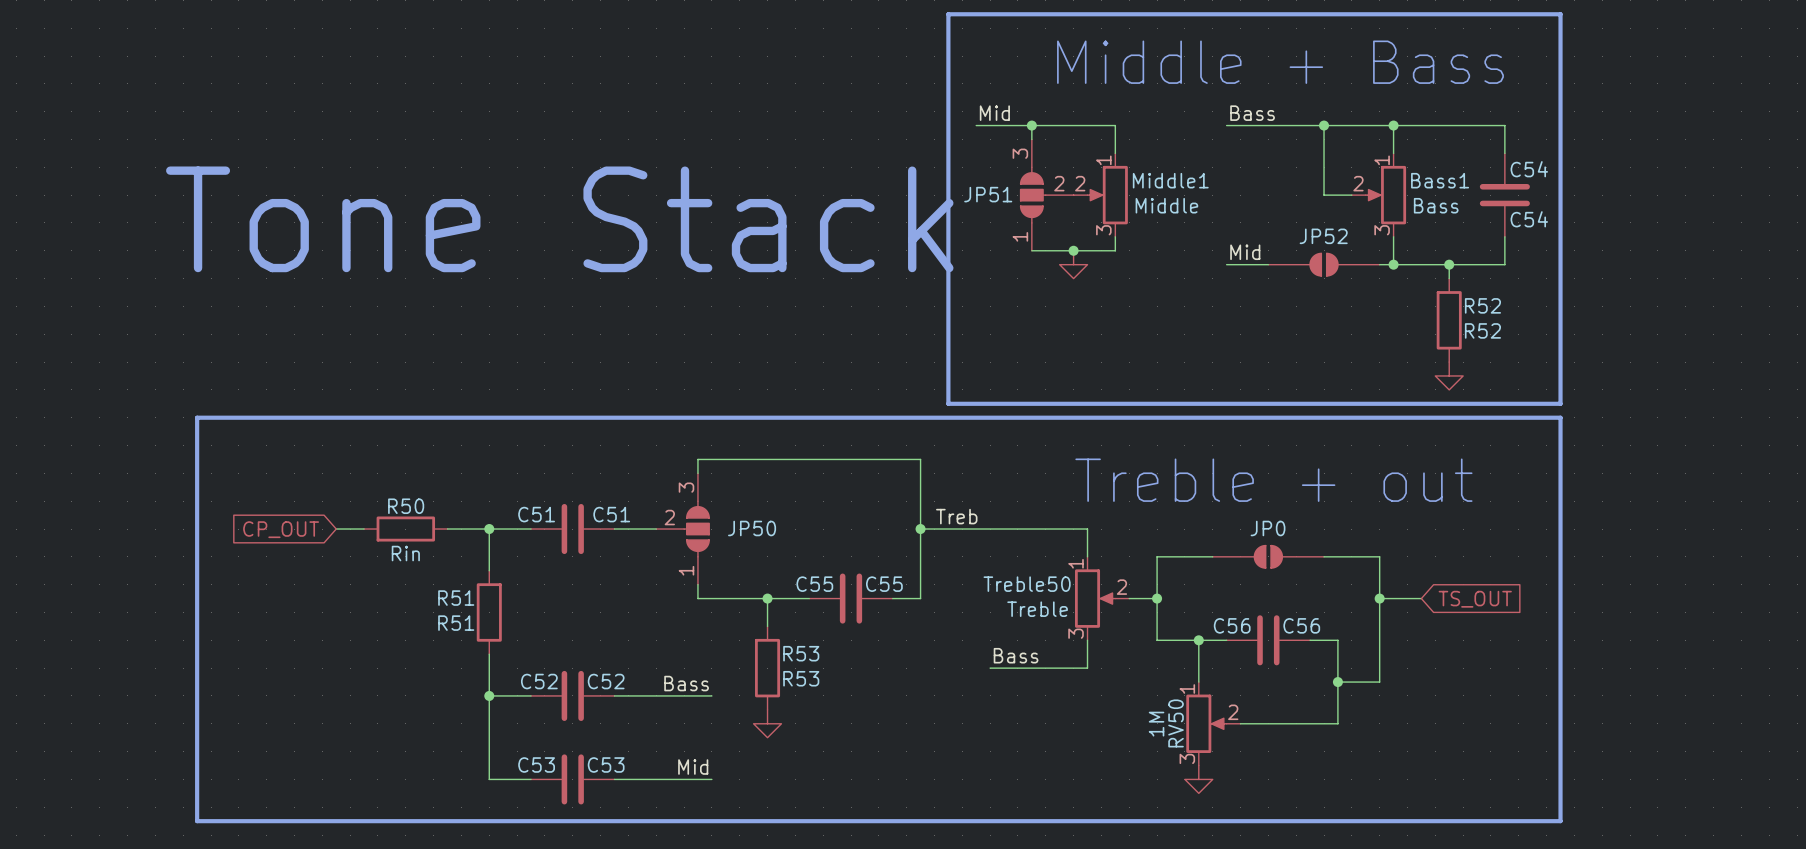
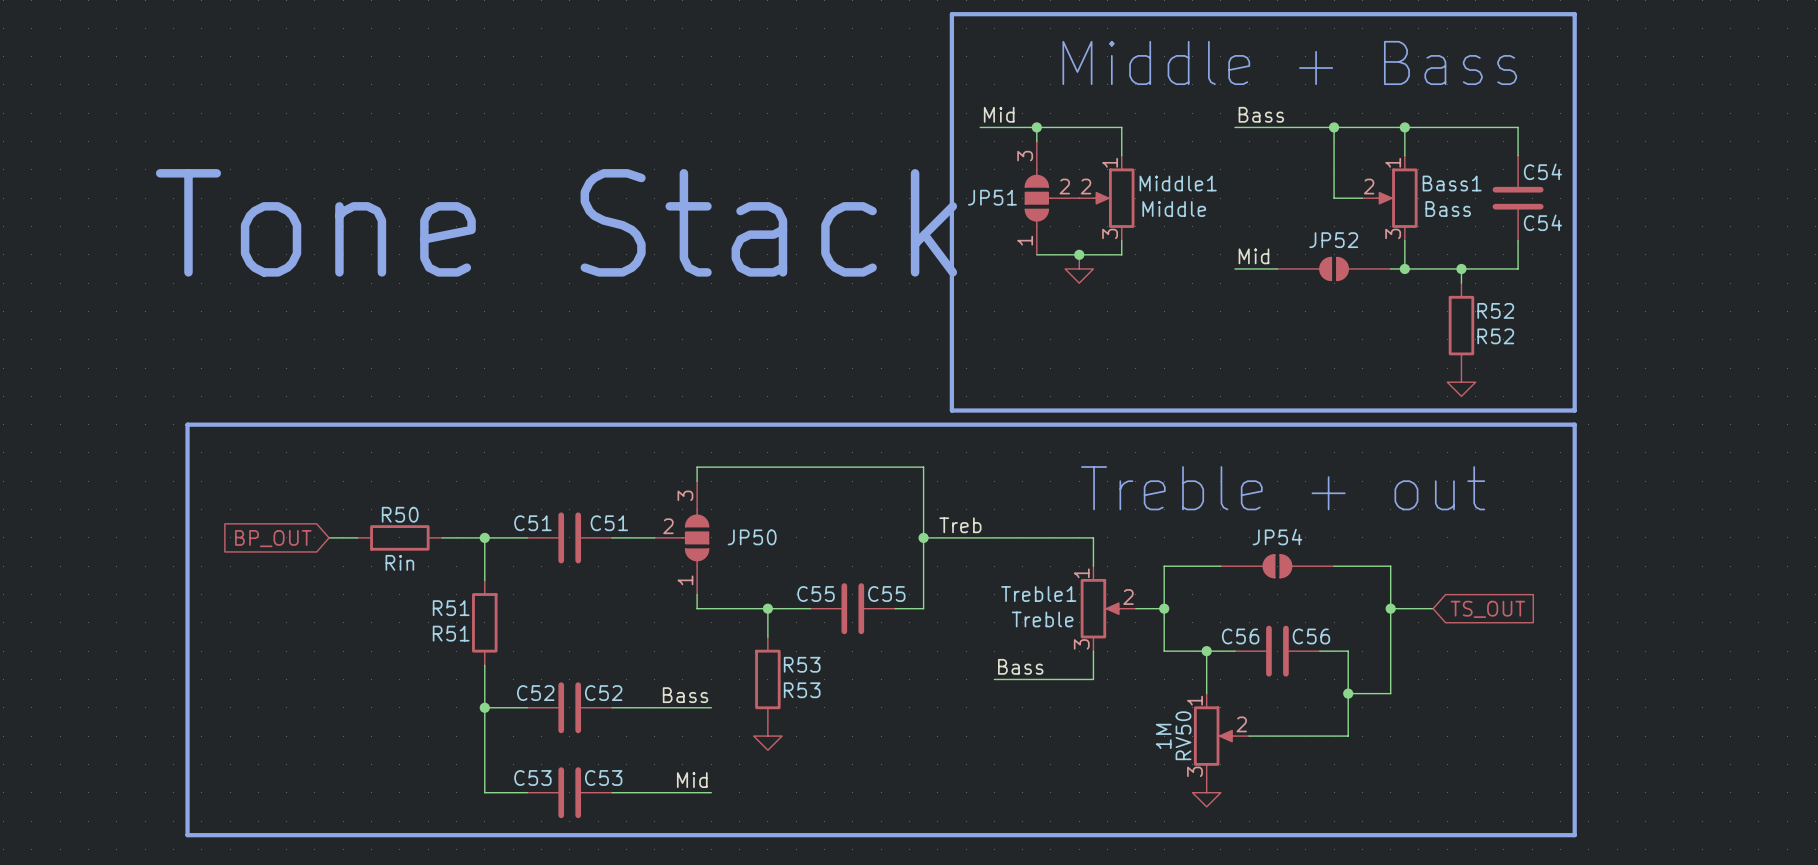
JP0 name: JP0 (1268, 528) -> JP54 (1277, 537)
global label: CP_OUT (281, 529) -> BP_OUT (273, 538)
Treble50 name: Treble50 (1027, 584) -> Treble1 (1038, 594)

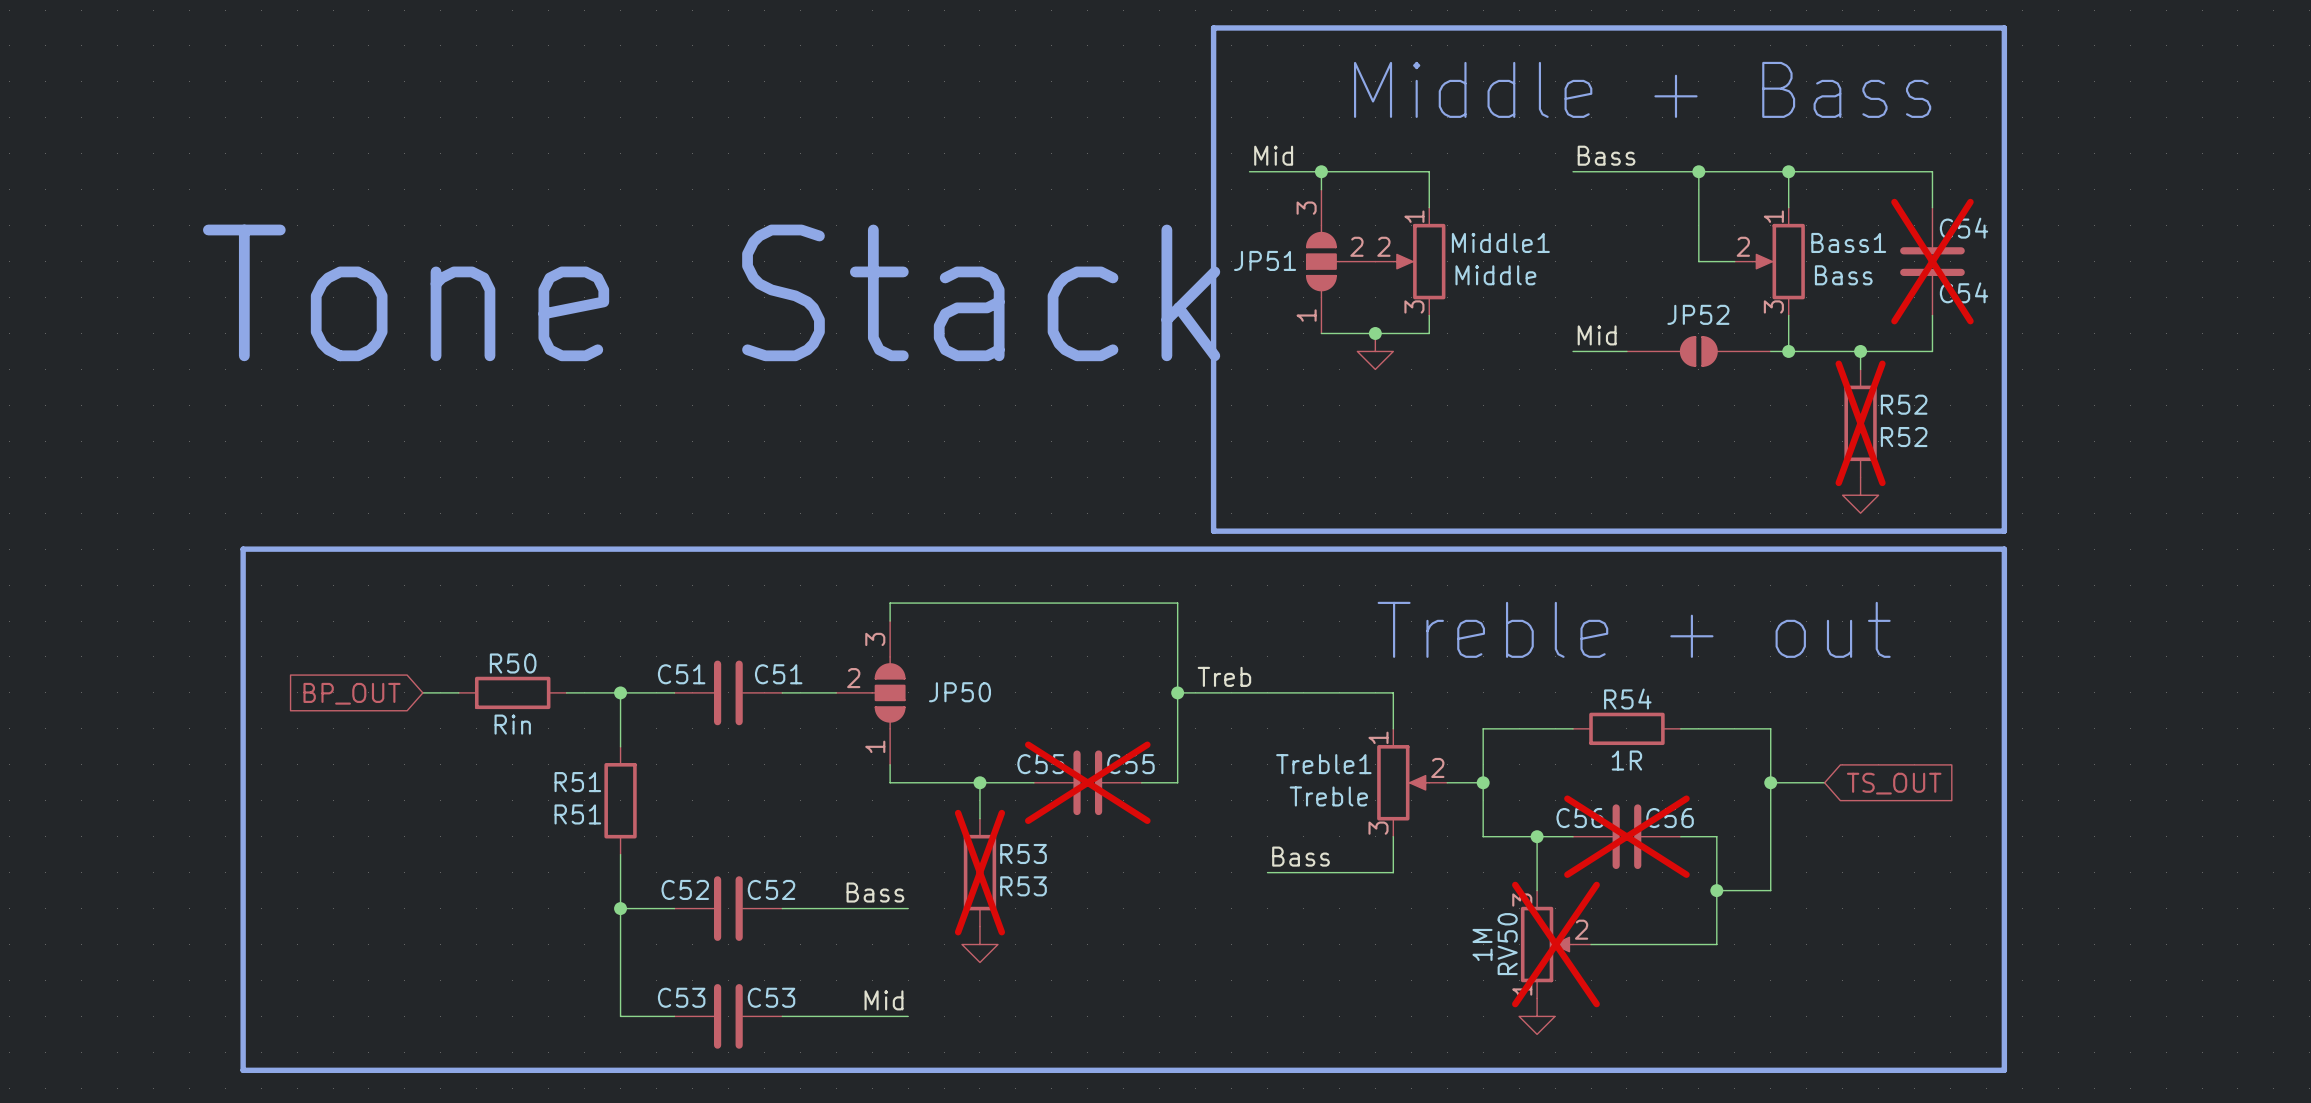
C54 do-not-place cross: none -> (1932, 261)
R52 do-not-place cross: none -> (1860, 423)
JP54: (1277, 566) -> none
R54: none -> 1R (1626, 728)
C55 do-not-place cross: none -> (1087, 782)
C56 do-not-place cross: none -> (1626, 836)
R53 do-not-place cross: none -> (979, 872)
RV50 flip: as is (1214, 736) -> up-down (1546, 944)
RV50 do-not-place cross: none -> (1555, 944)

